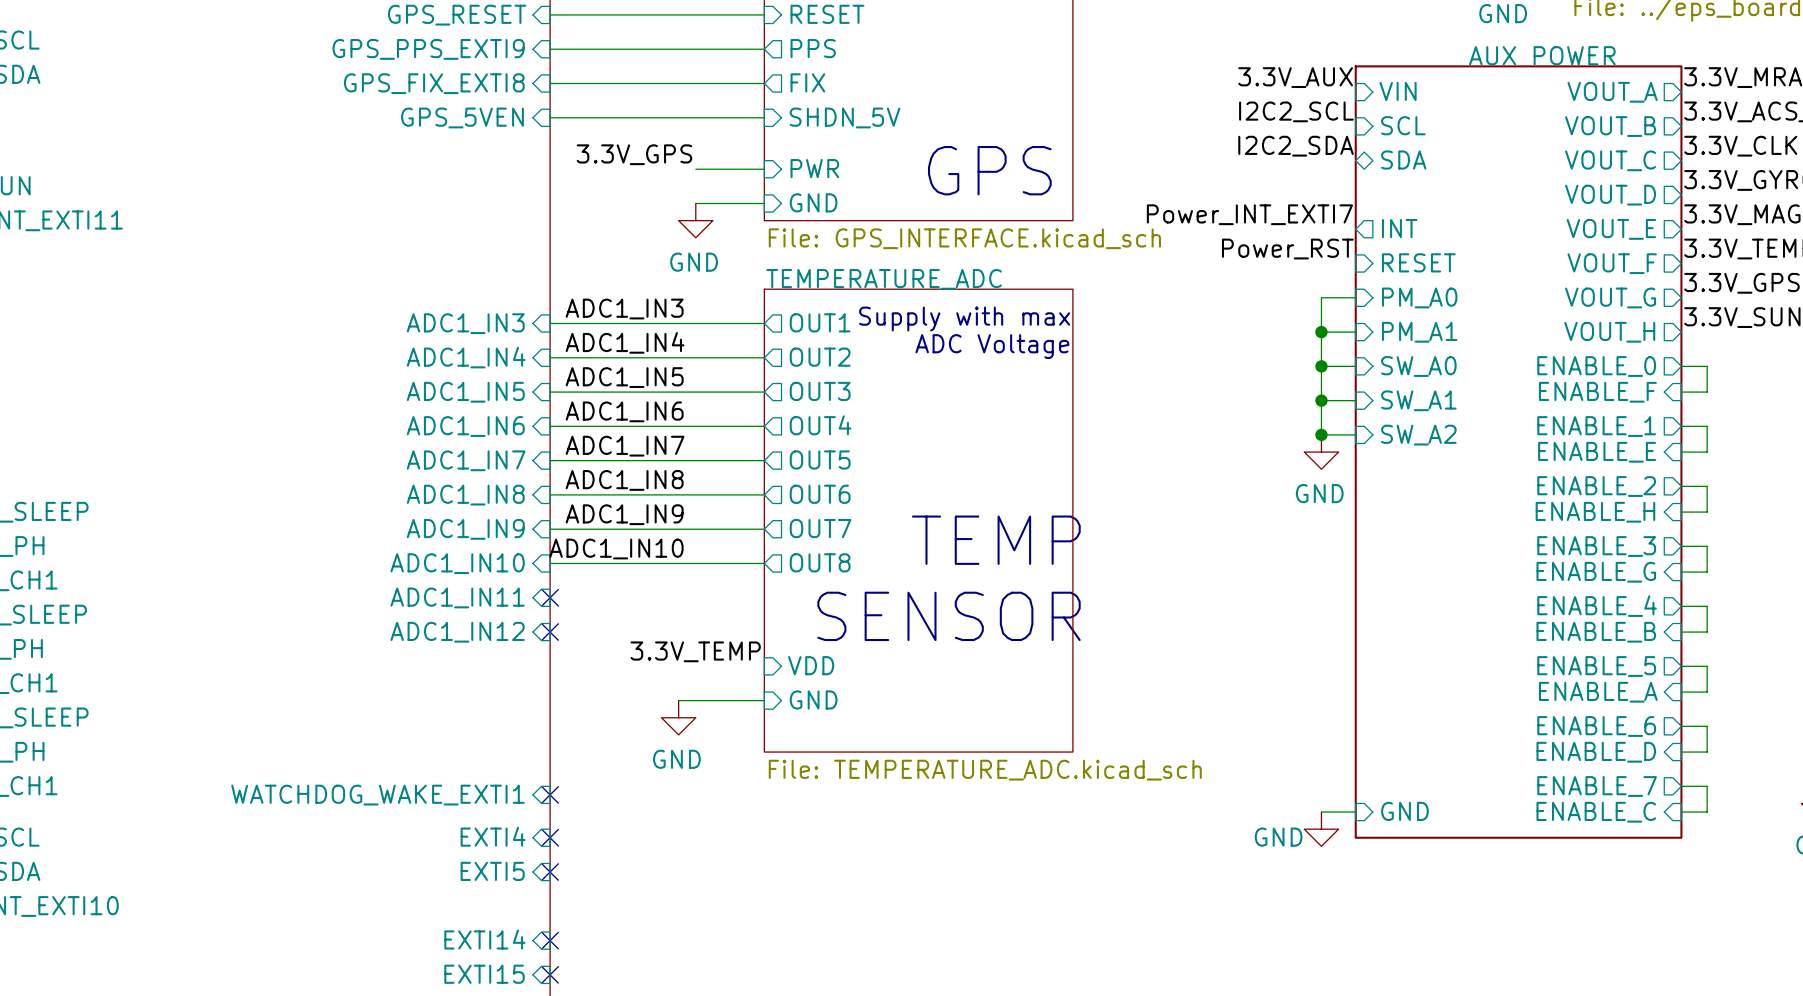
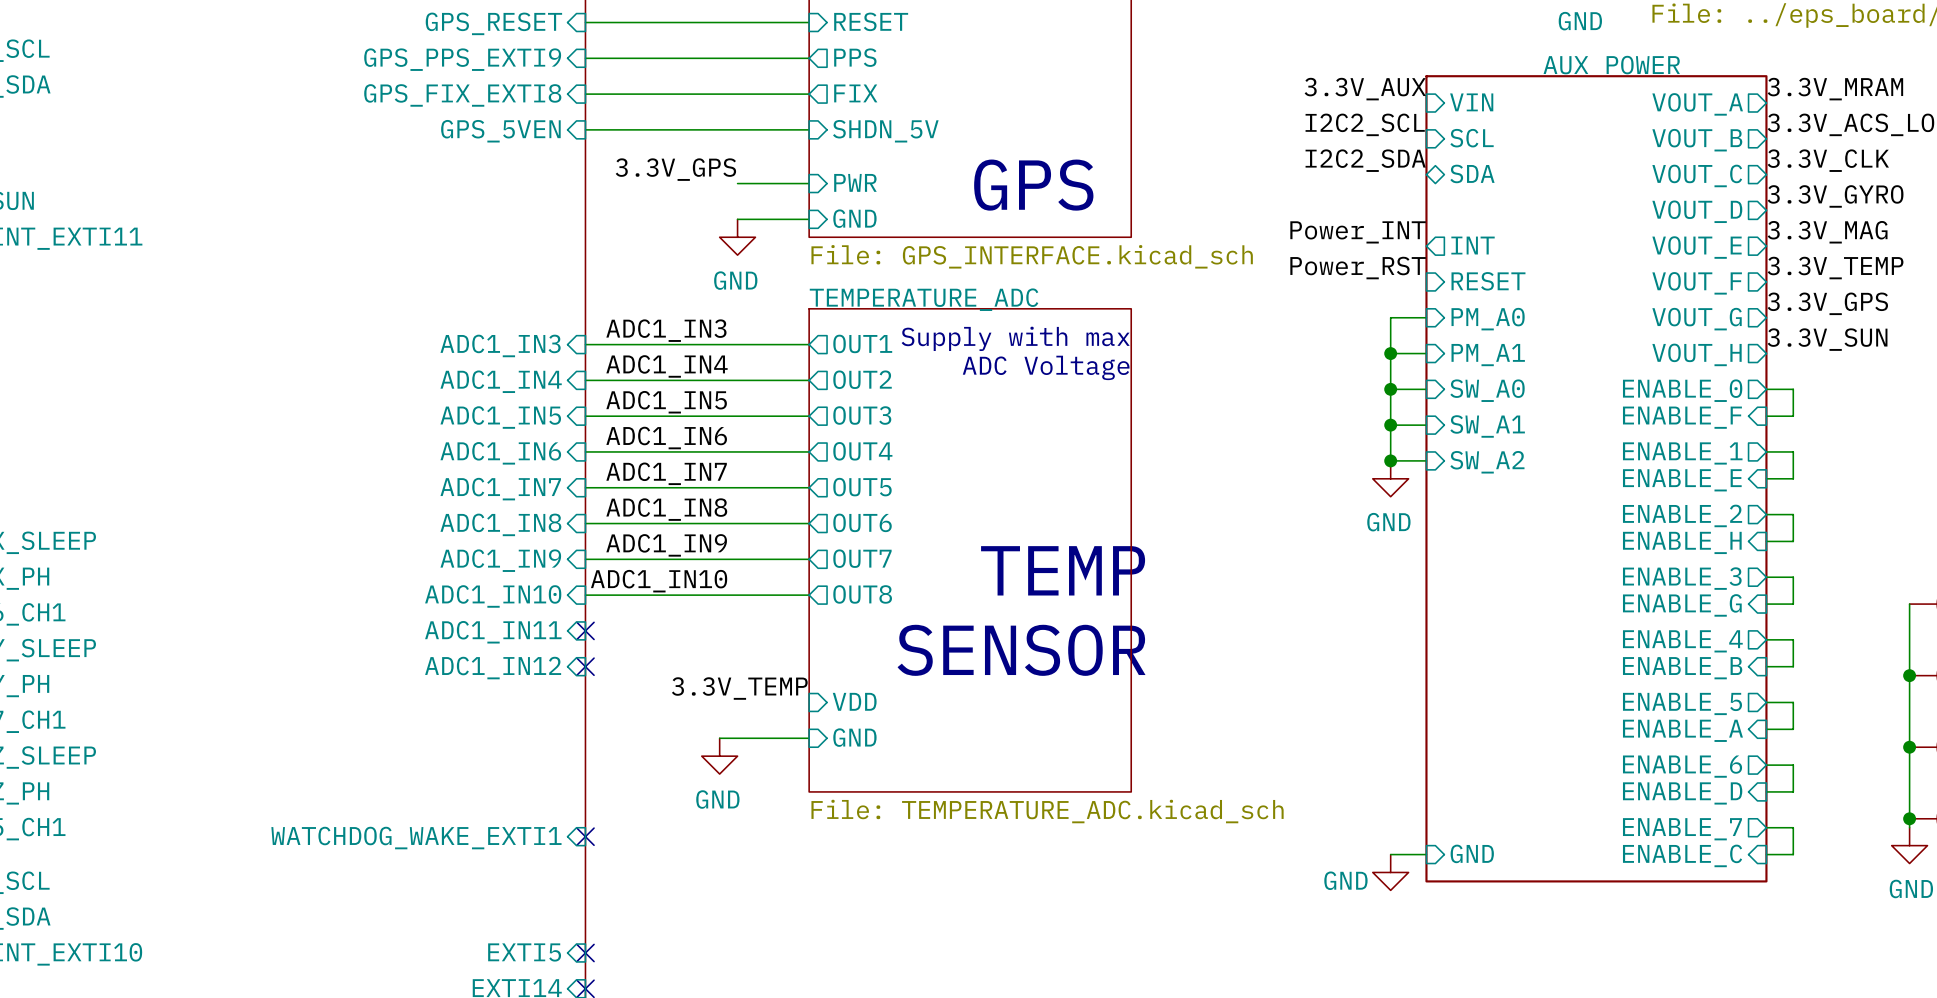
label: Power_INT_EXTI7 (1249, 214) -> Power_INT (1358, 232)
sheet pin: EXTI4 (493, 836) -> none
no-connect mark: (550, 837) -> none
sheet pin position: EXTI5 (492, 871) -> EXTI5 (524, 952)
no-connect mark: (550, 872) -> none
no-connect mark: none -> (585, 952)

